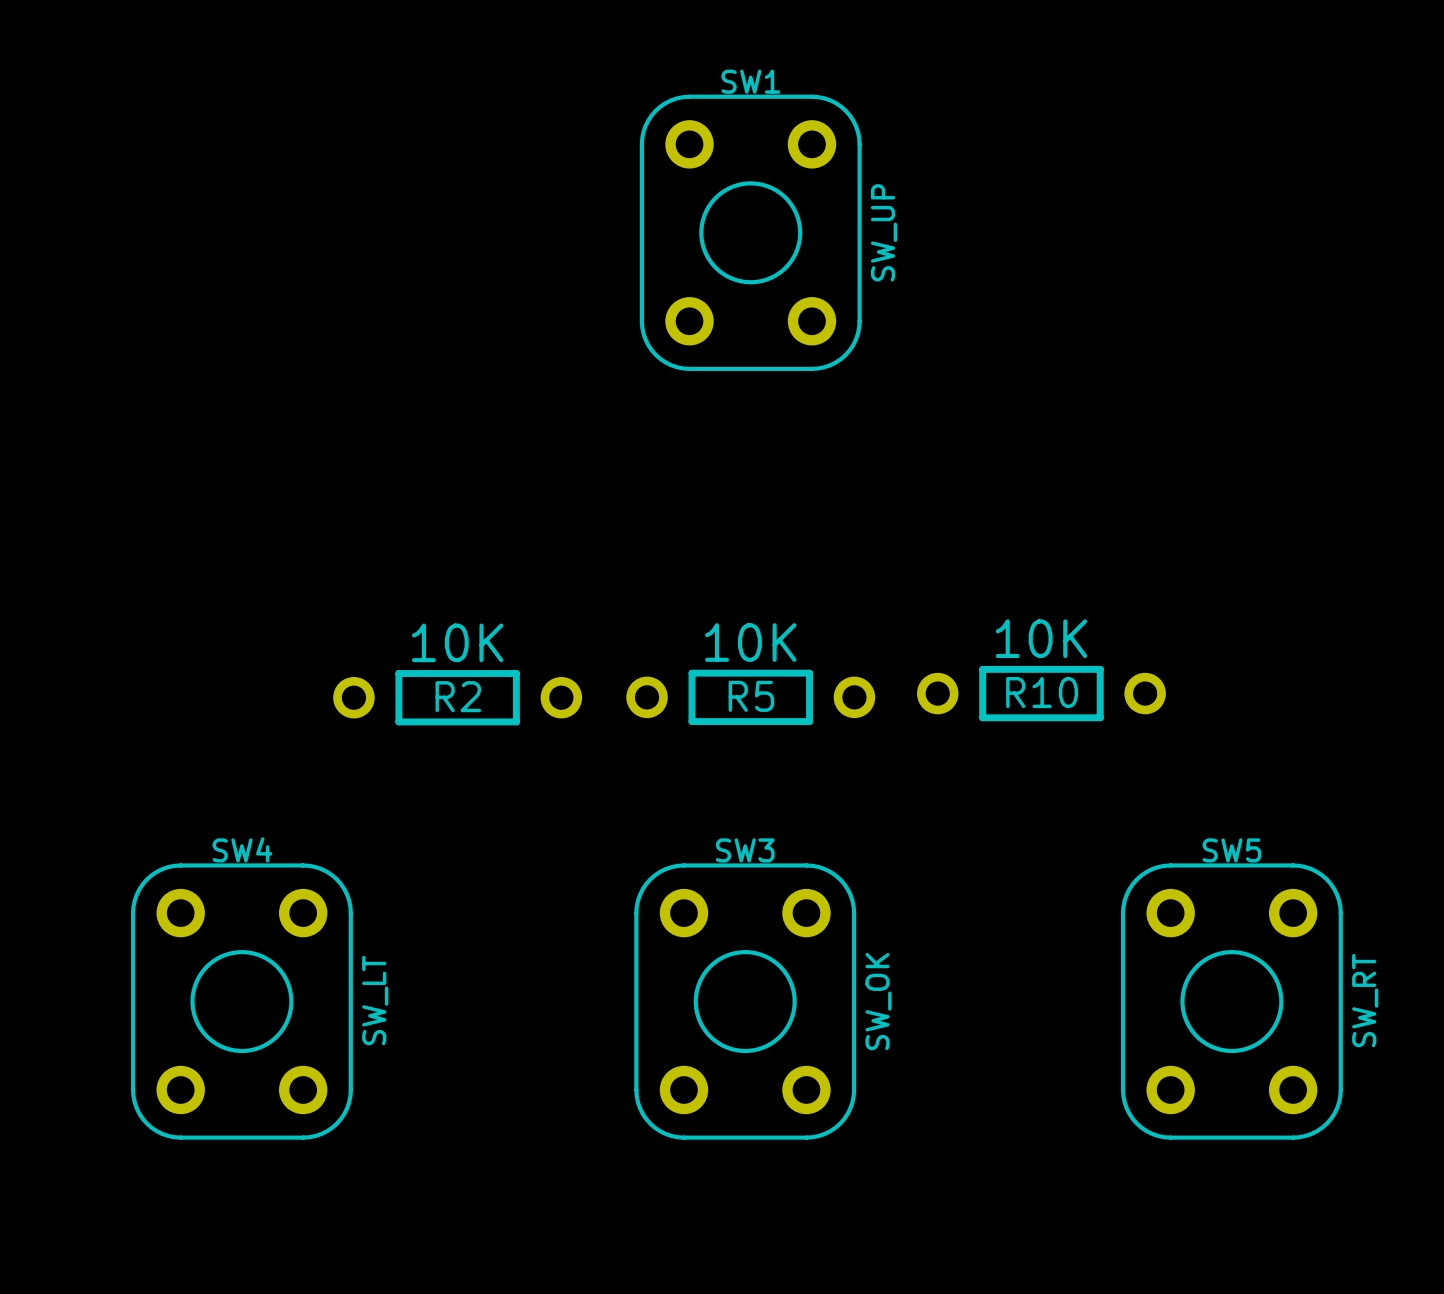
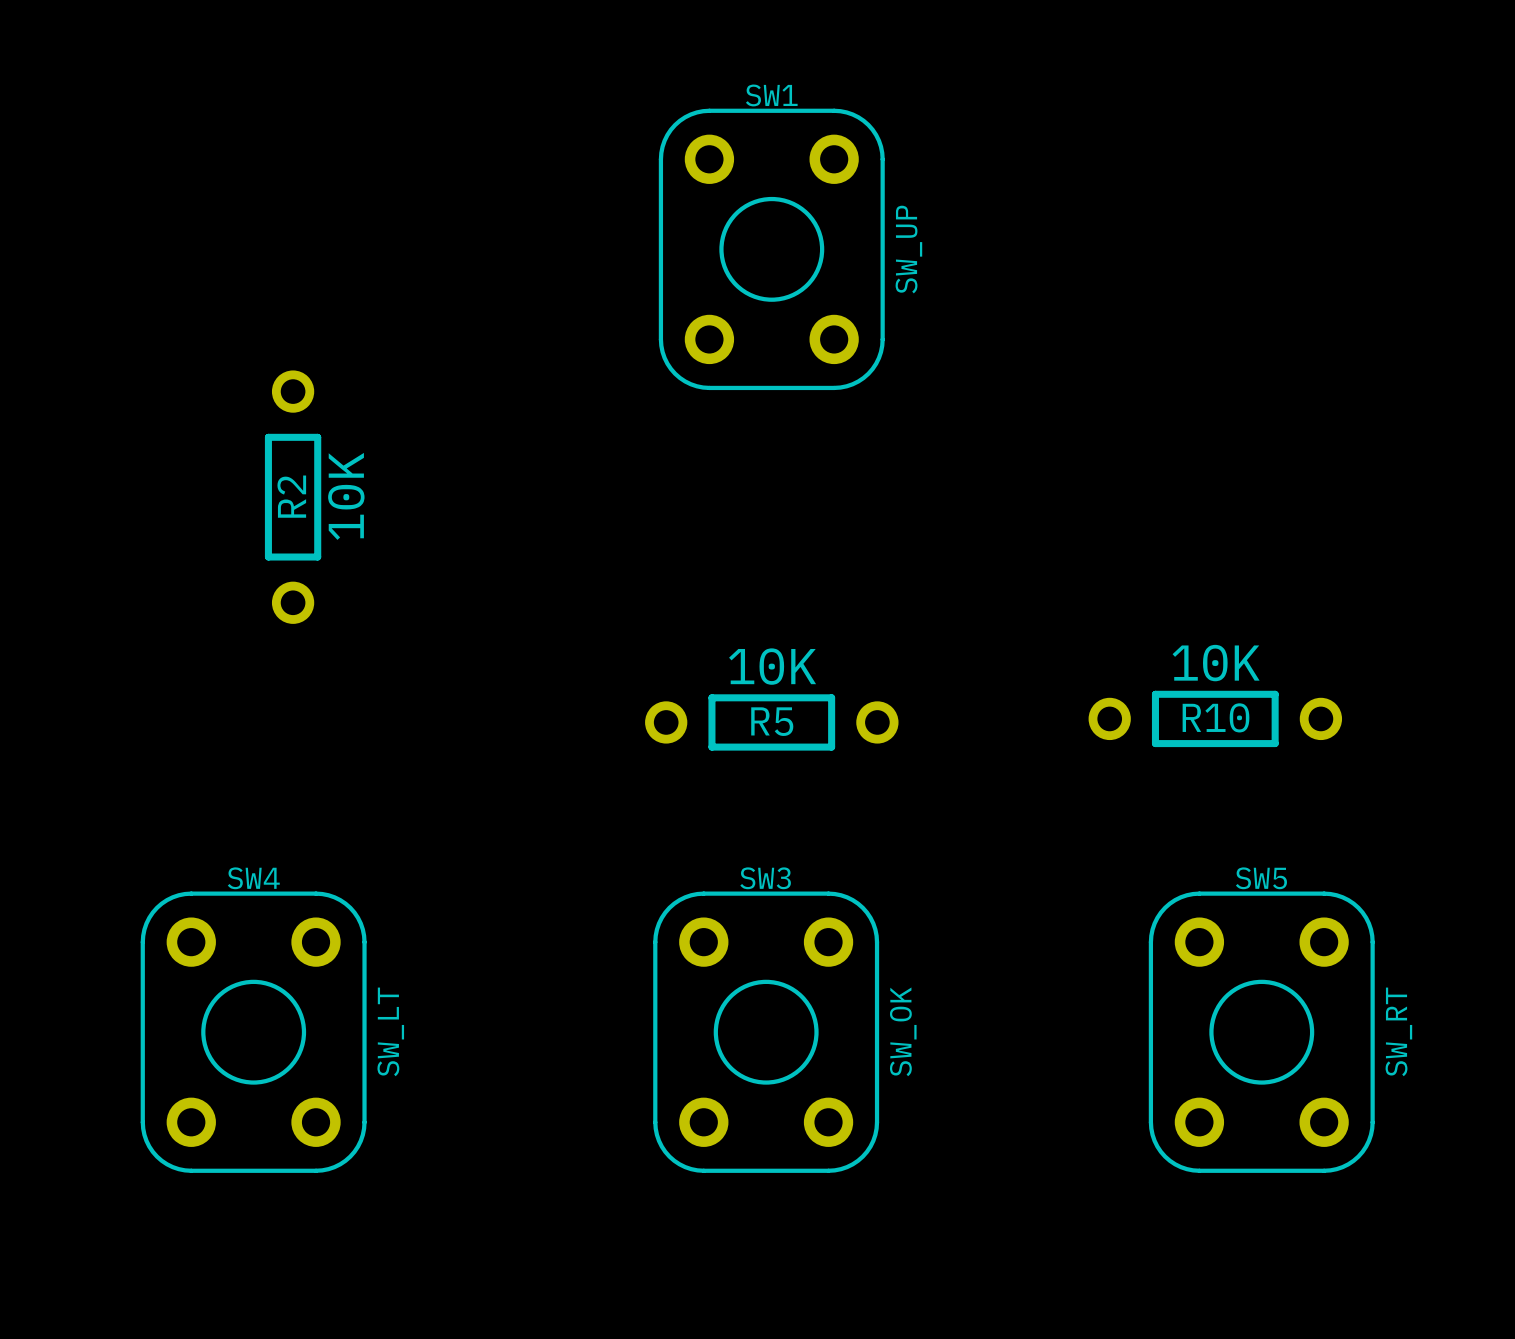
R10 position: (1041, 693) -> (1215, 718)
R2 rotation: 0° (457, 697) -> 90° clockwise (293, 497)
R2 position: (457, 697) -> (293, 497)

